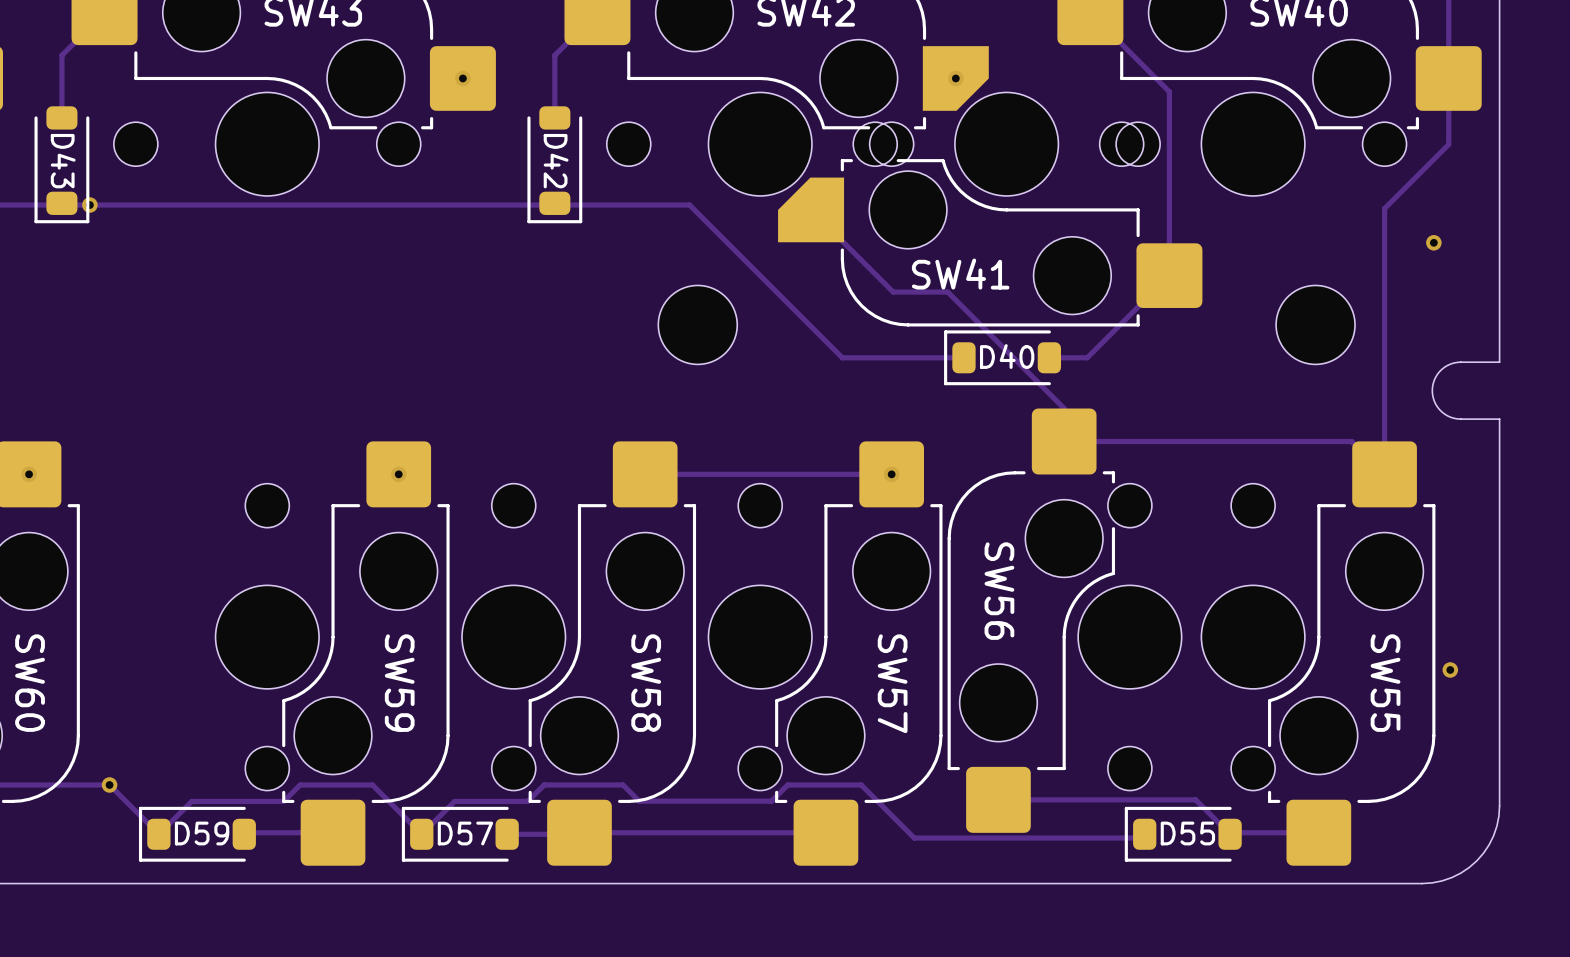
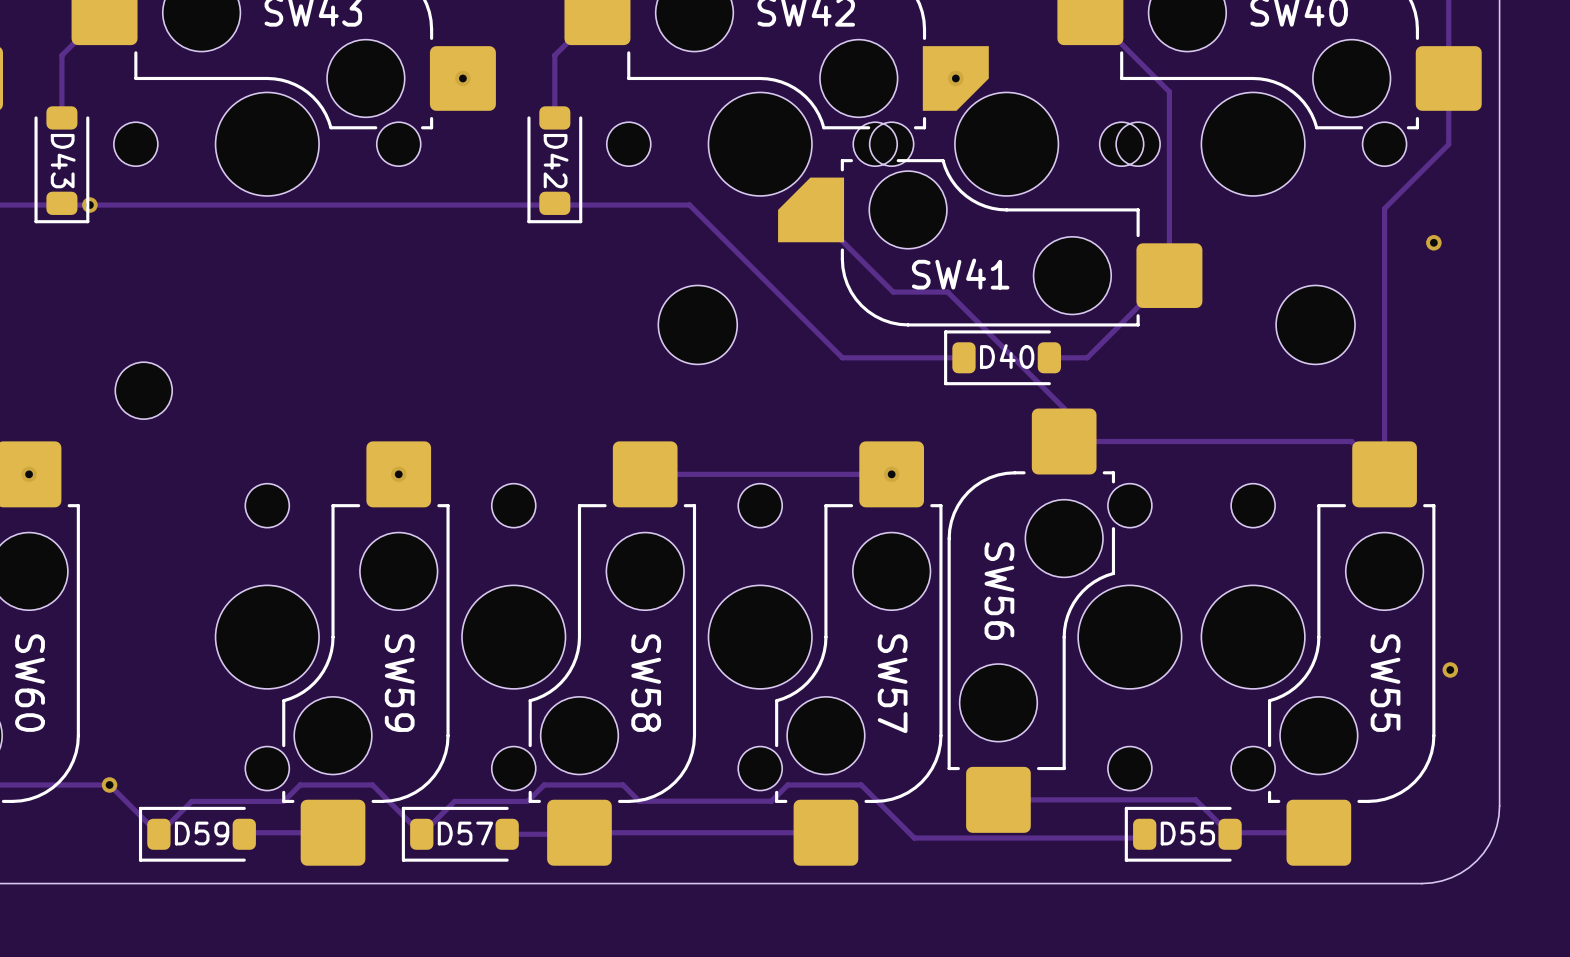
drawing: [1431, 361, 1501, 420] -> none
board edge: none -> (1499, 362) (1499, 419)
part: none -> (143, 390)

